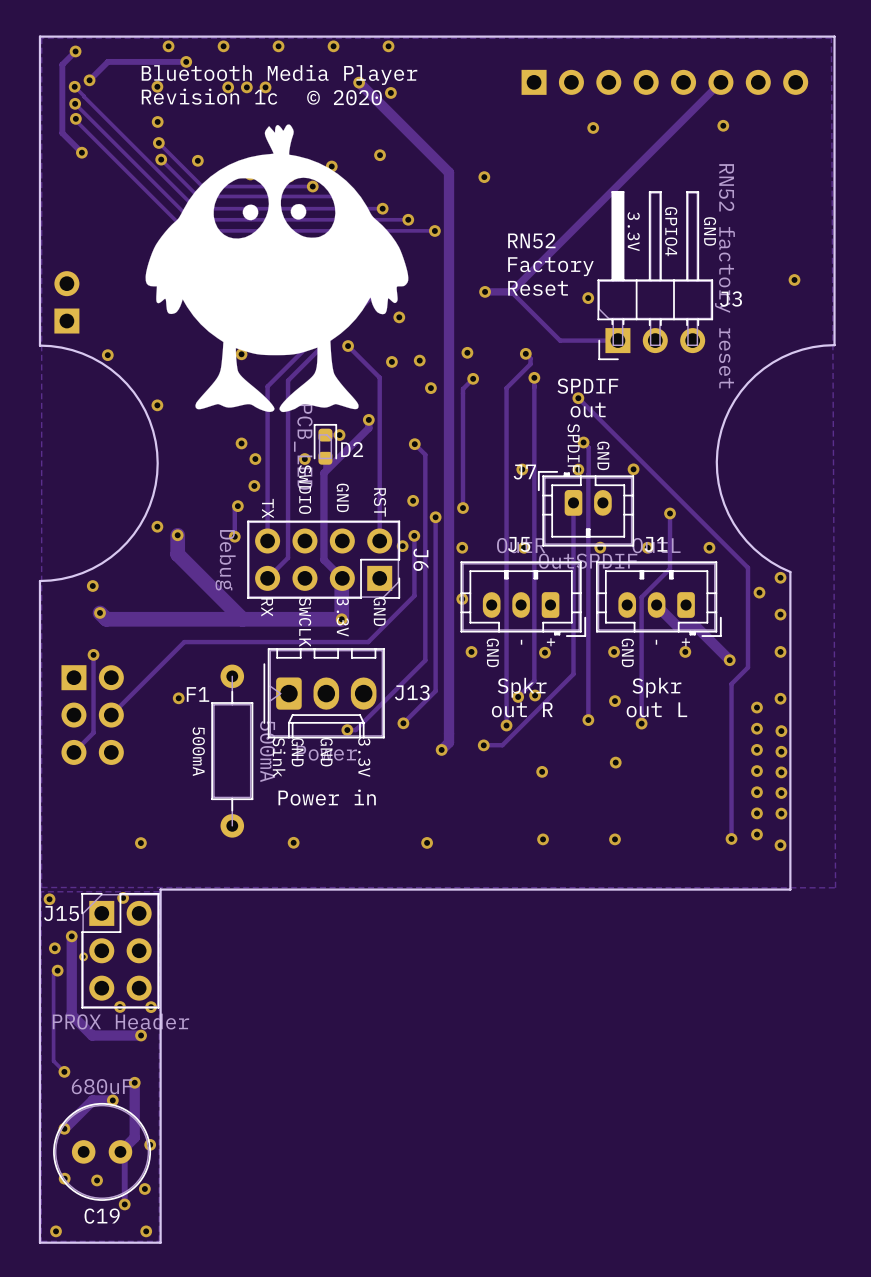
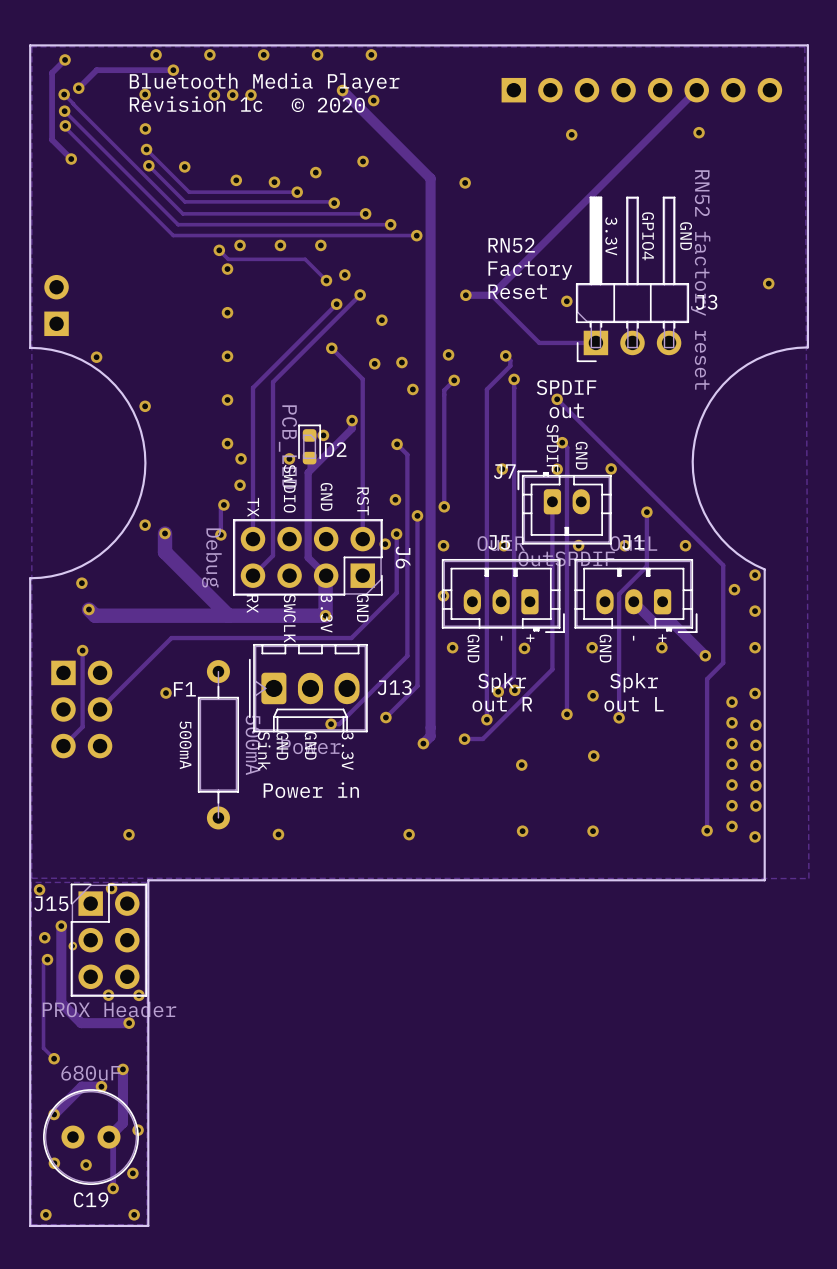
drawing: [145, 124, 409, 413] -> none

